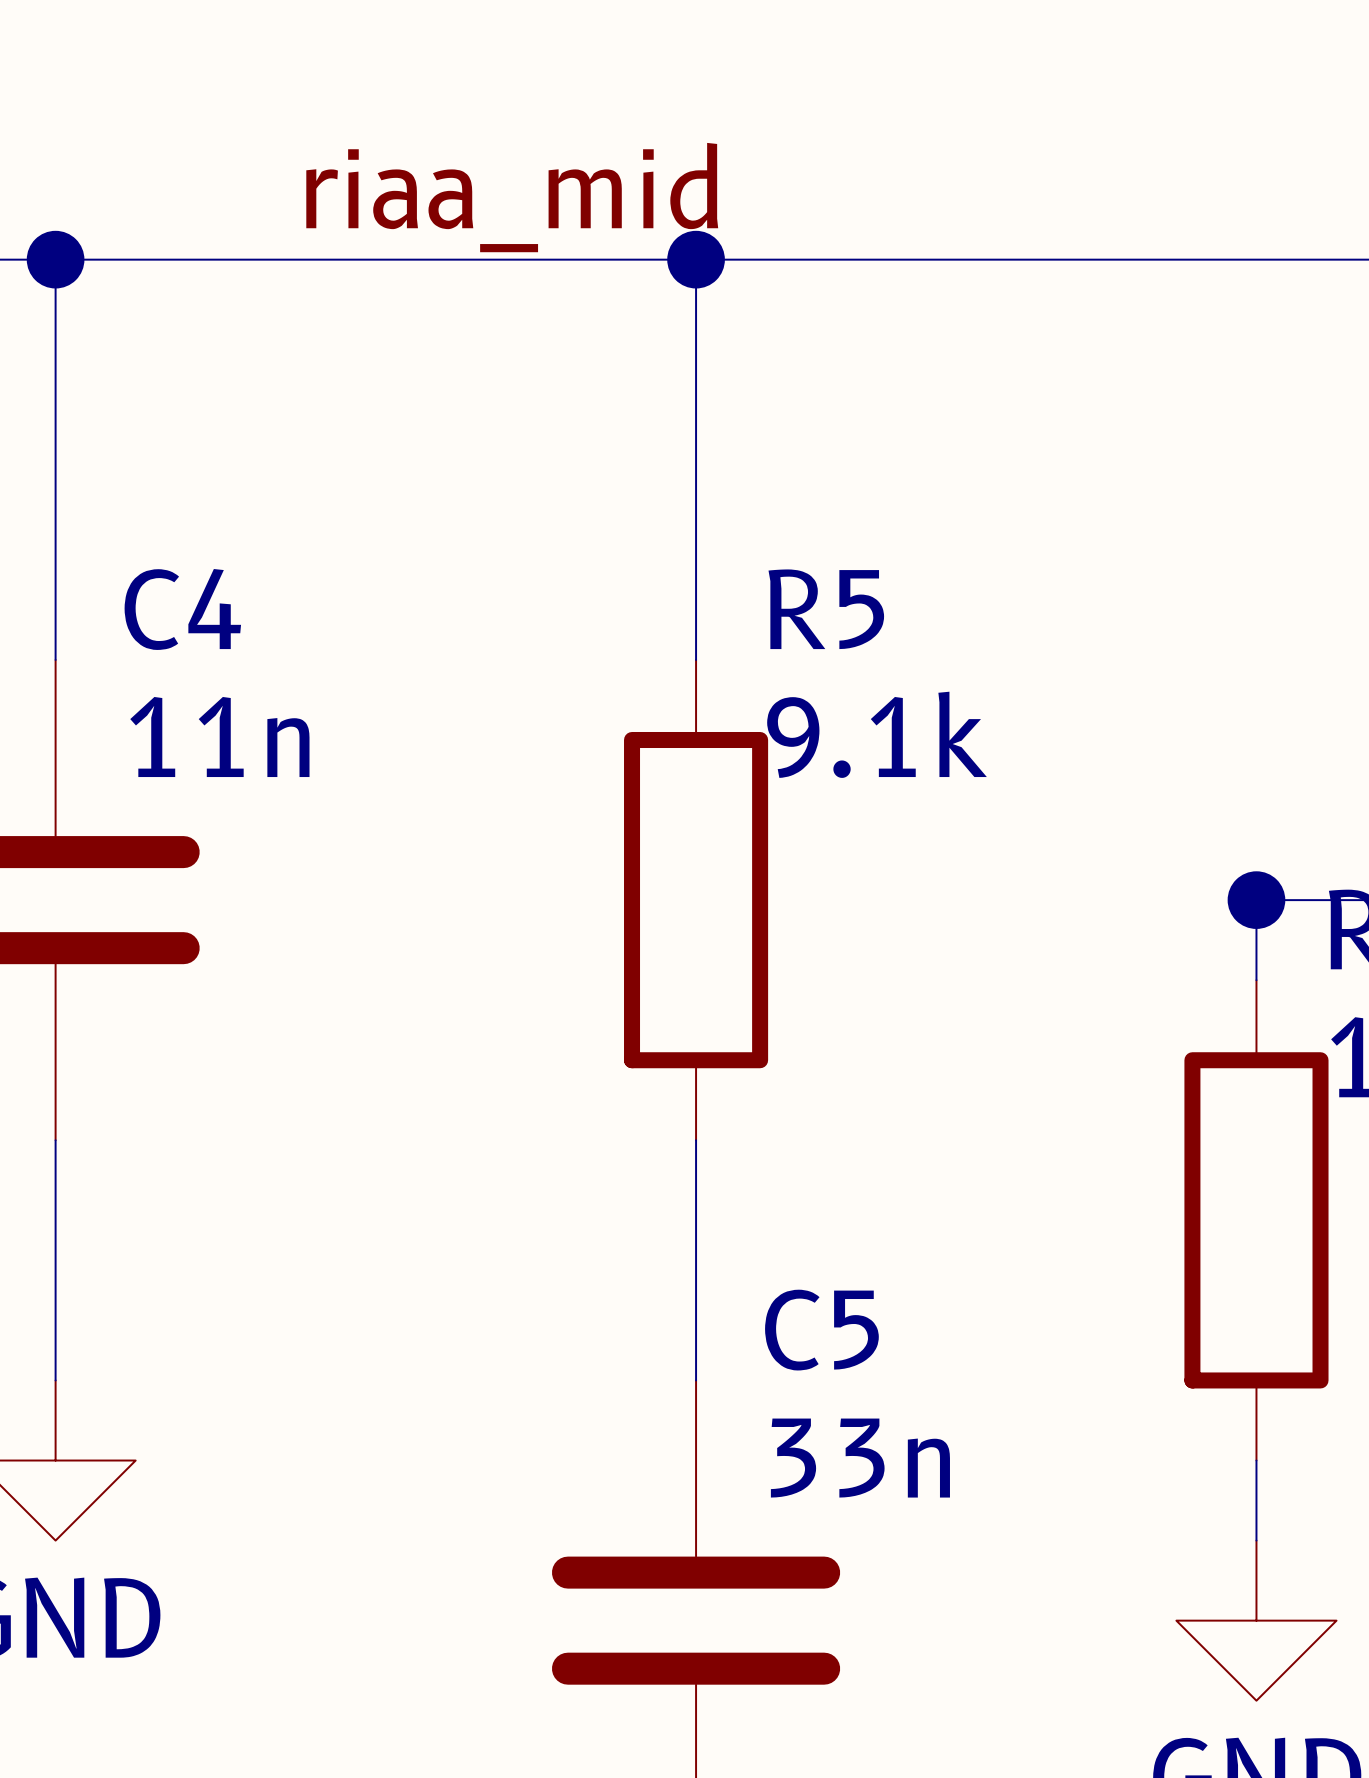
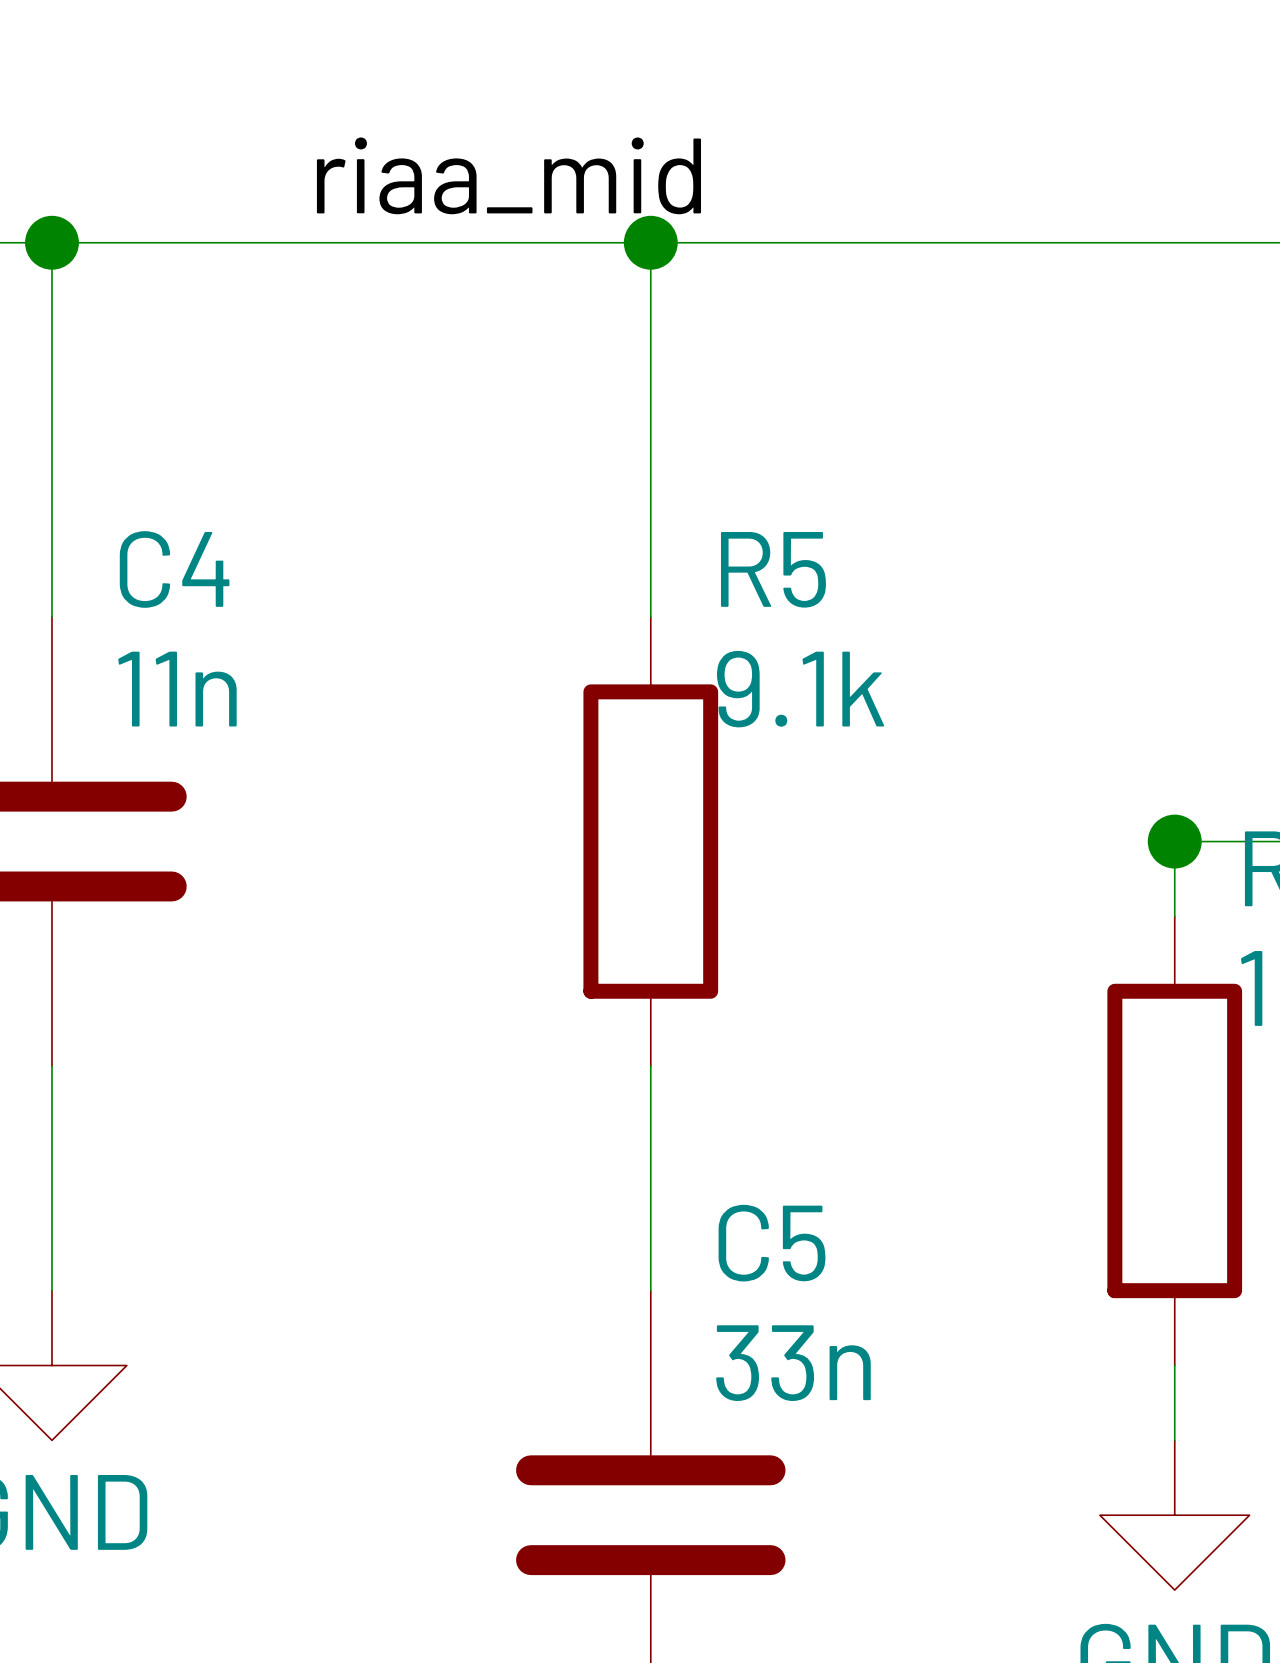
label position: riaa_mid (512, 197) -> riaa_mid (508, 175)

